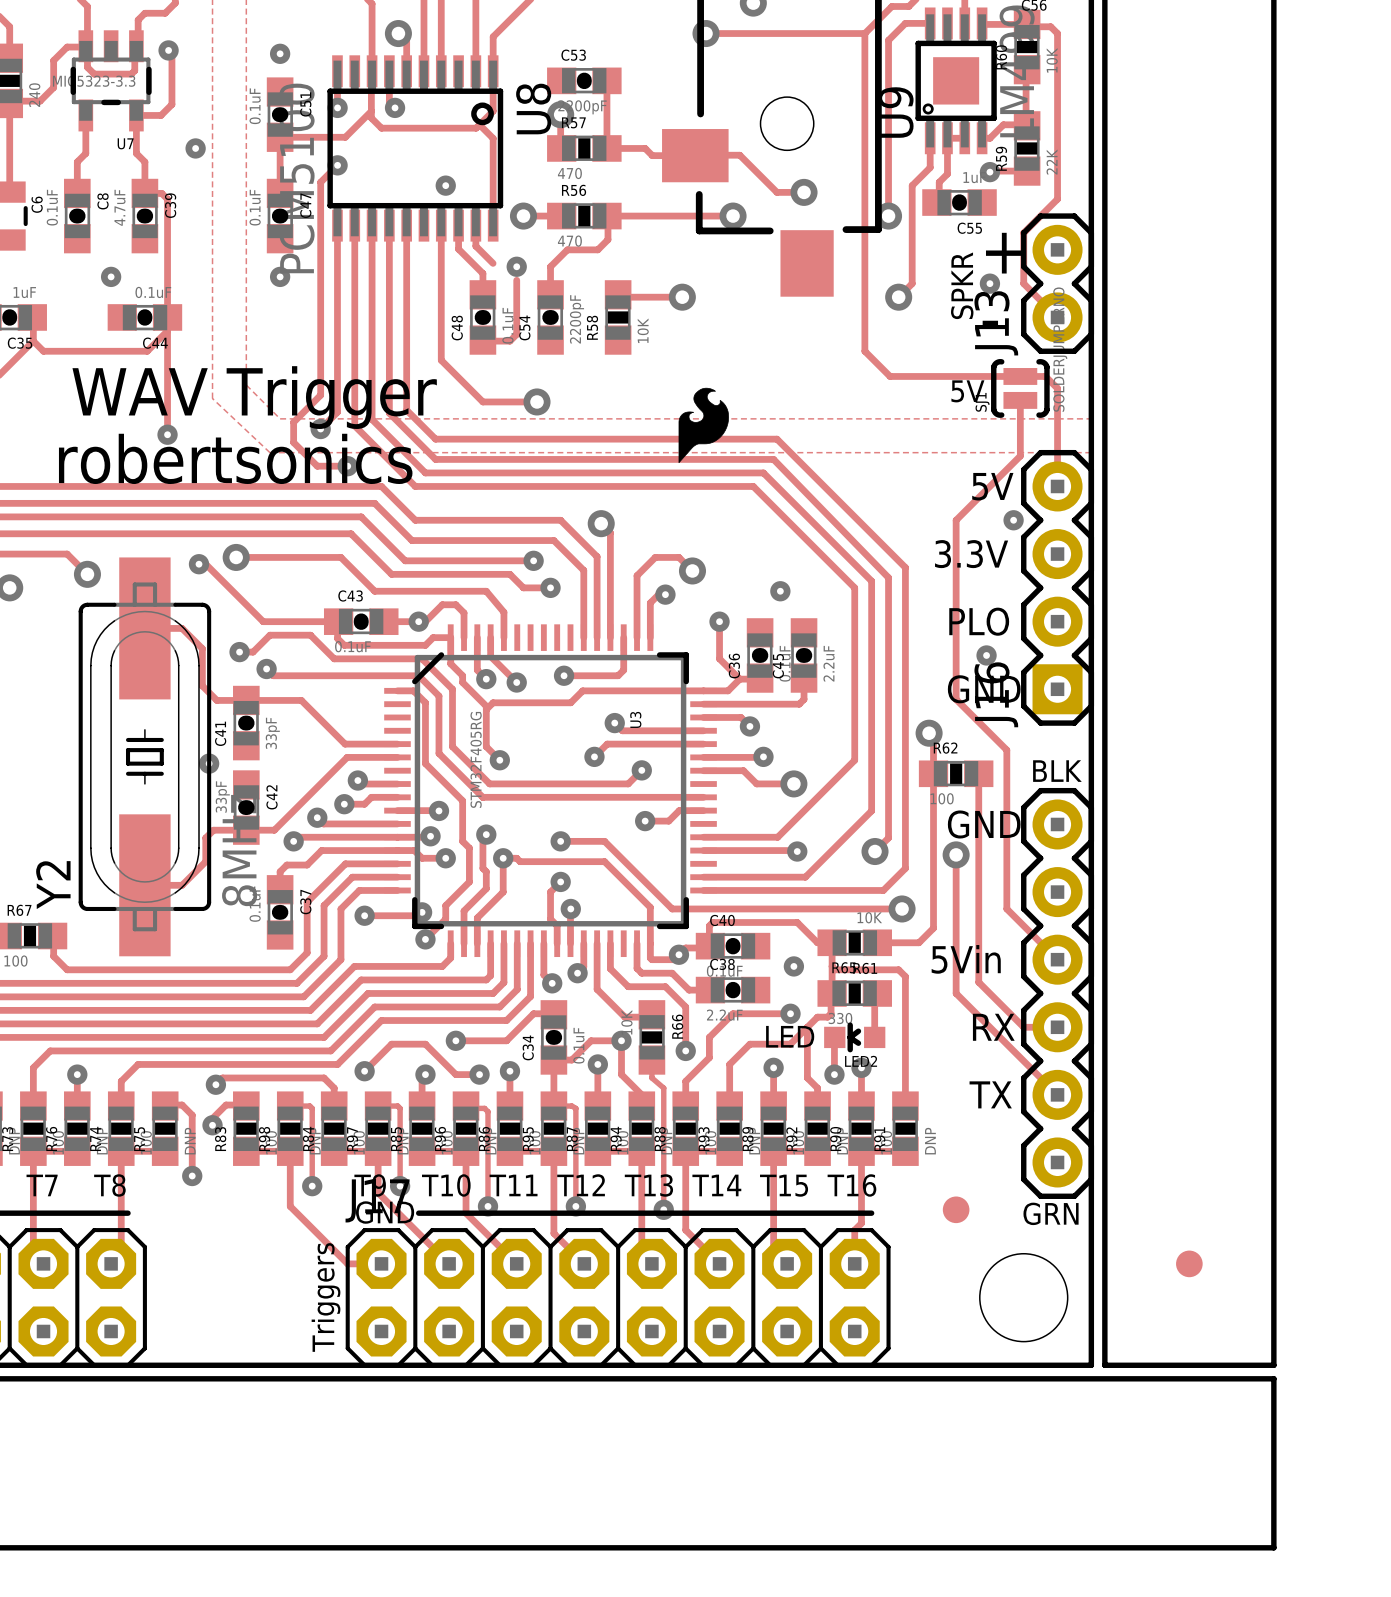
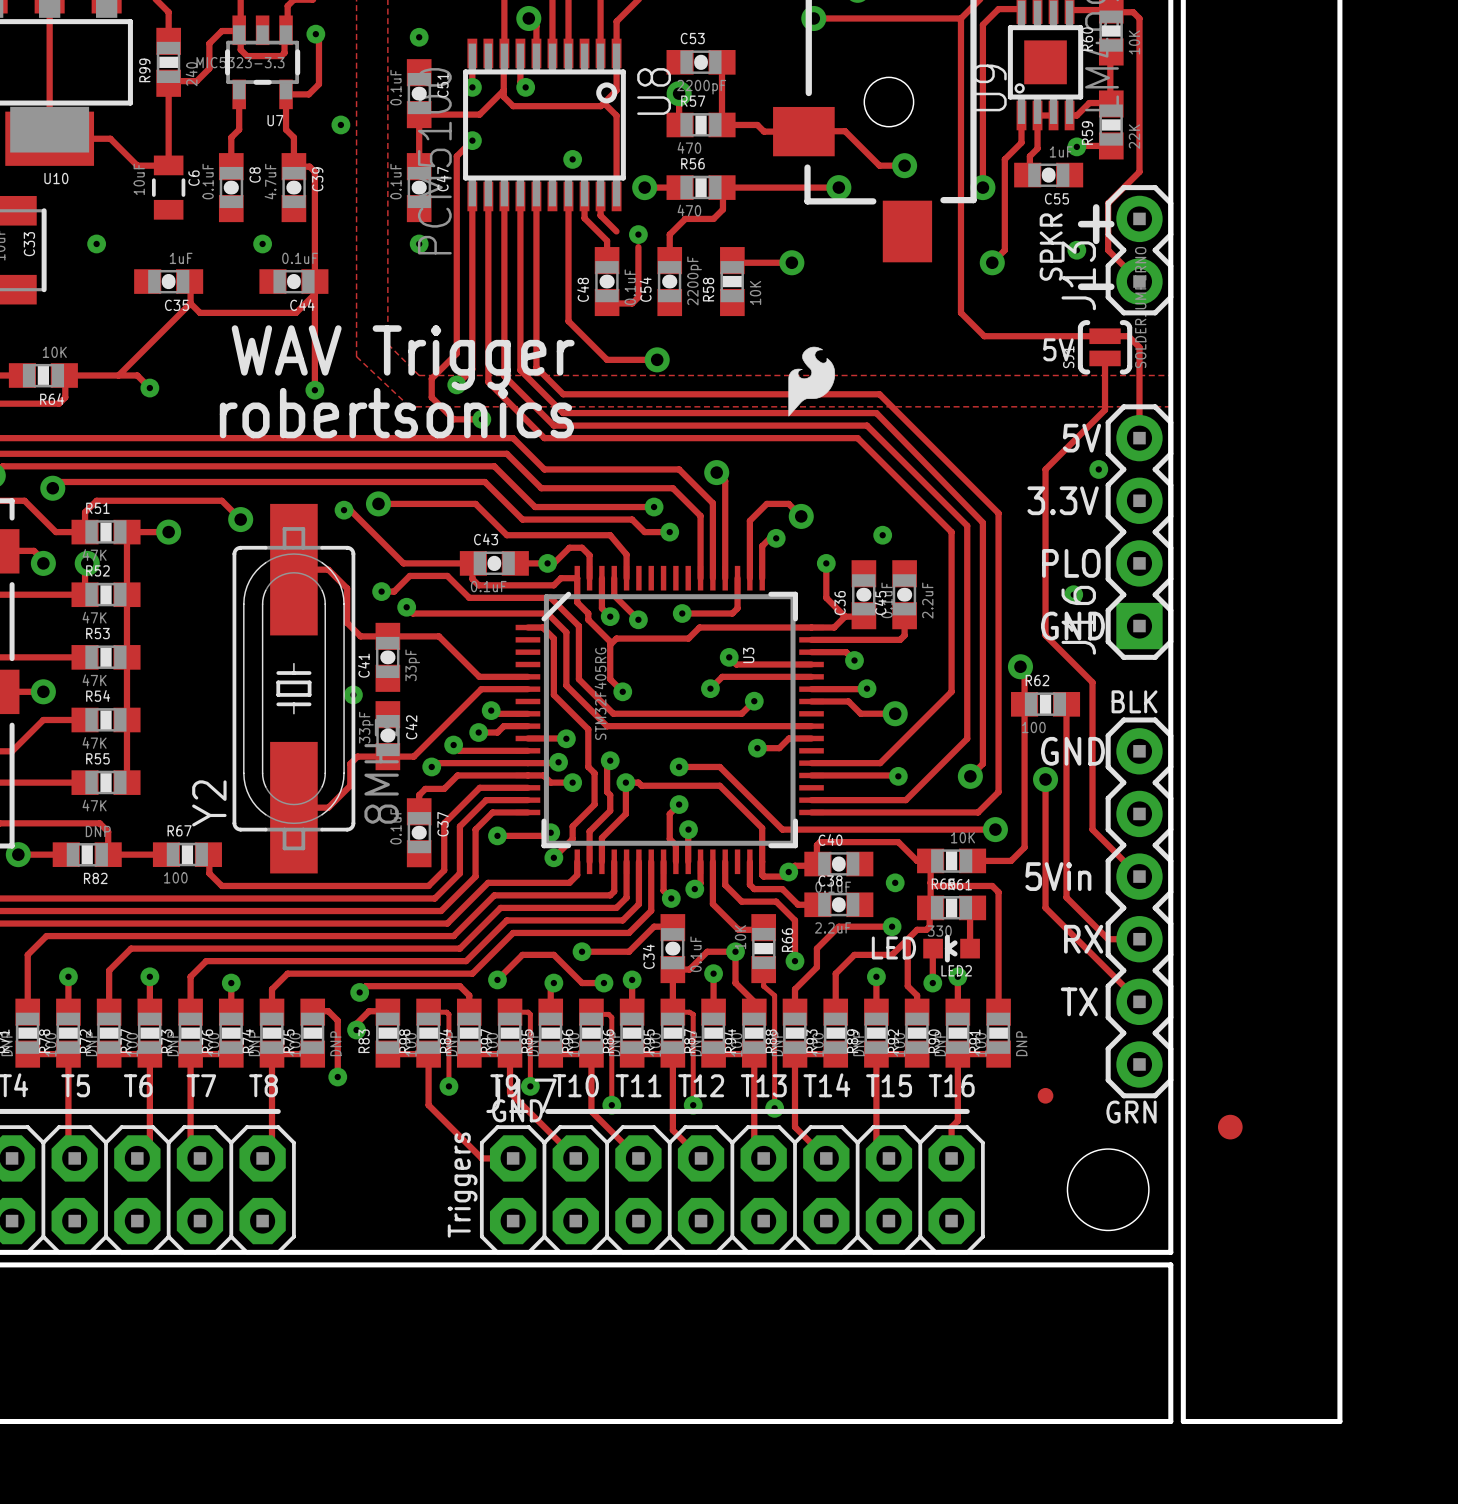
part footprint: [942, 1196, 970, 1224] -> [1037, 1087, 1054, 1104]
part position: (1189, 1263) -> (1230, 1127)
board edge: (1104, 1365) (1273, 1365) -> (1339, 1264) (1339, 1252)
board edge: none -> (1183, 1252) (1183, 1421)
board edge: (1091, 1378) (1273, 1378) -> none
board edge: (1091, 1547) (1104, 1547) -> (1170, 1421) (1170, 1264)

